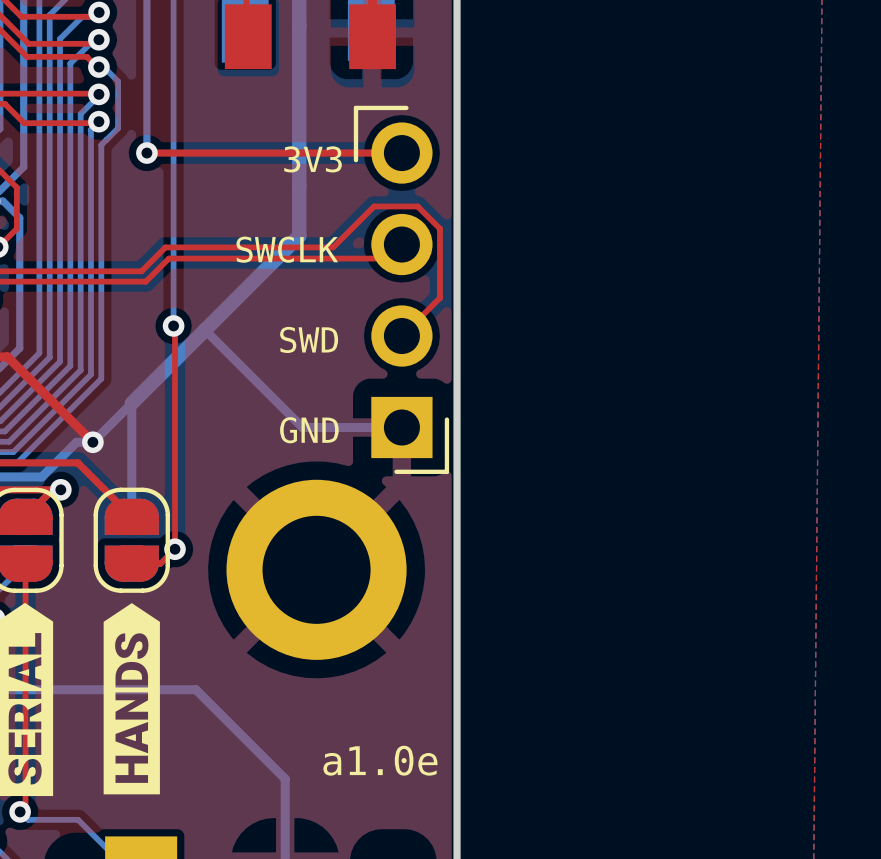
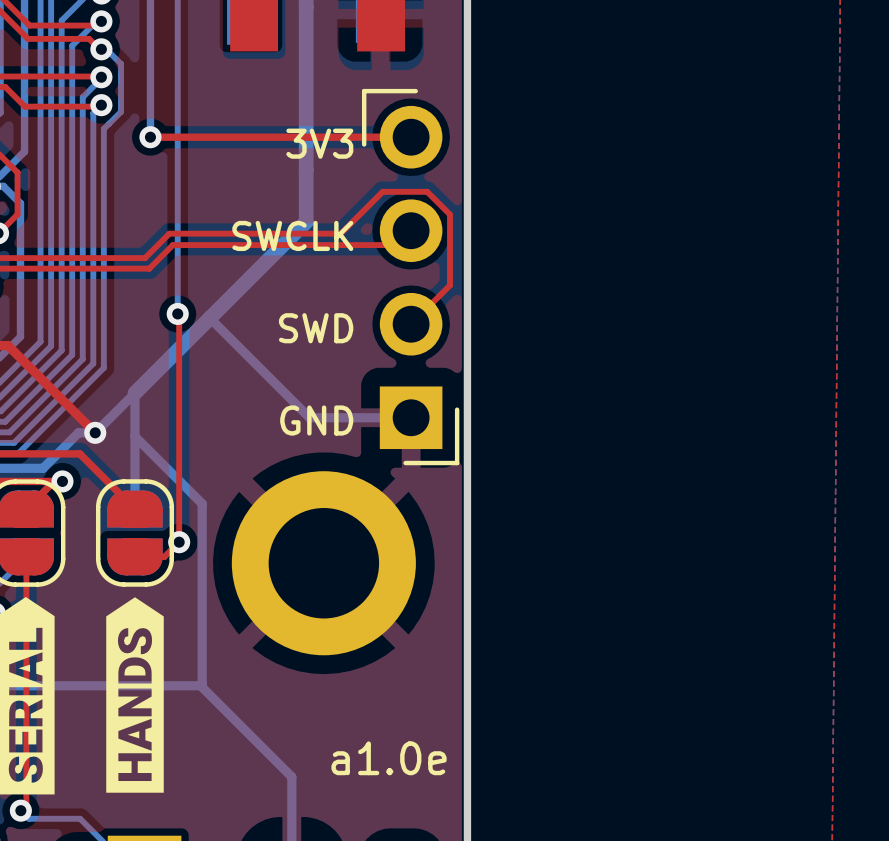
bottom track: none -> (134, 436) (202, 503) (202, 684) (200, 685)

